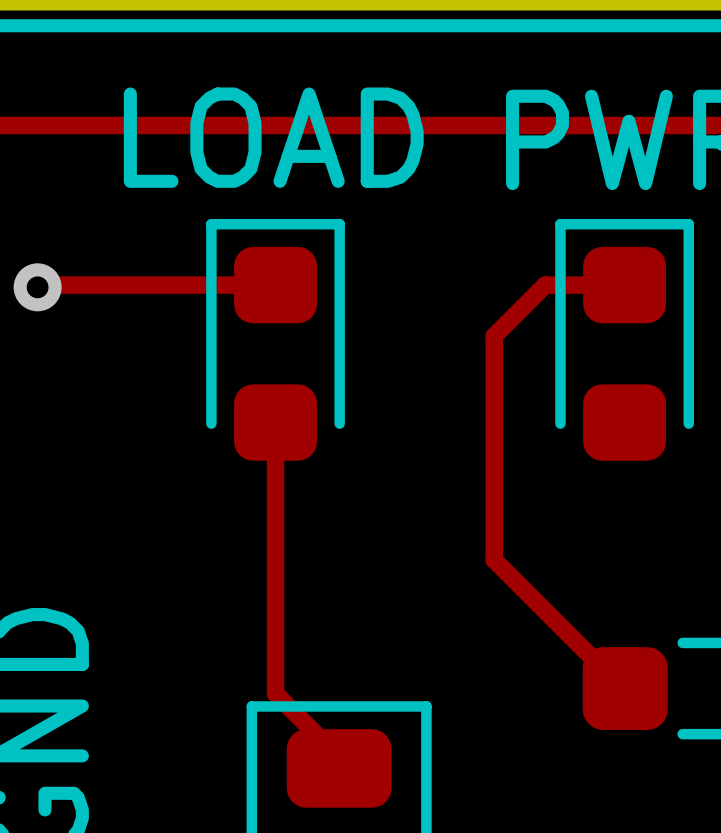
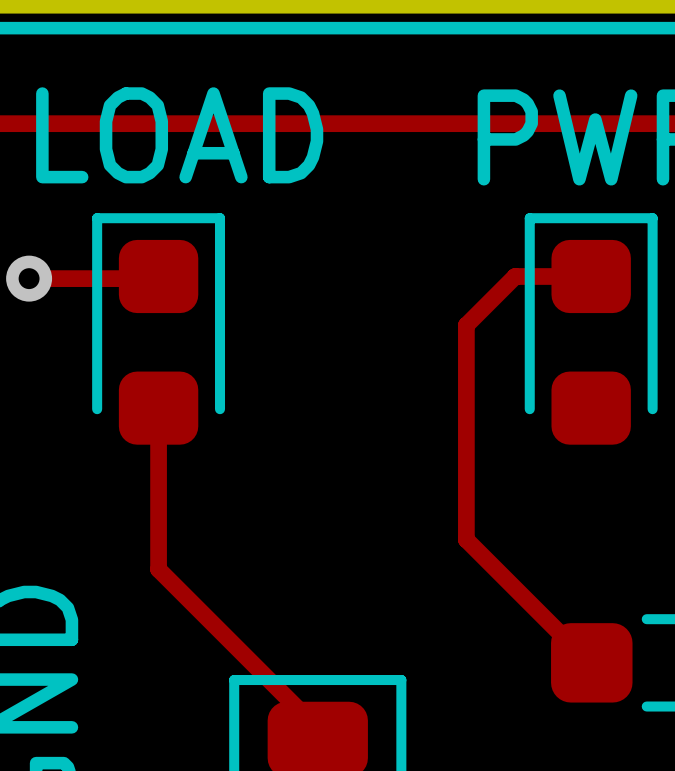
text position: LOAD (273, 137) -> LOAD (179, 135)
top track: (275, 285) (39, 285) (37, 287) -> (158, 276) (156, 278) (29, 278)
part position: (275, 339) -> (158, 328)
top track: (275, 422) (275, 693) -> (158, 408) (158, 569) (256, 667)

